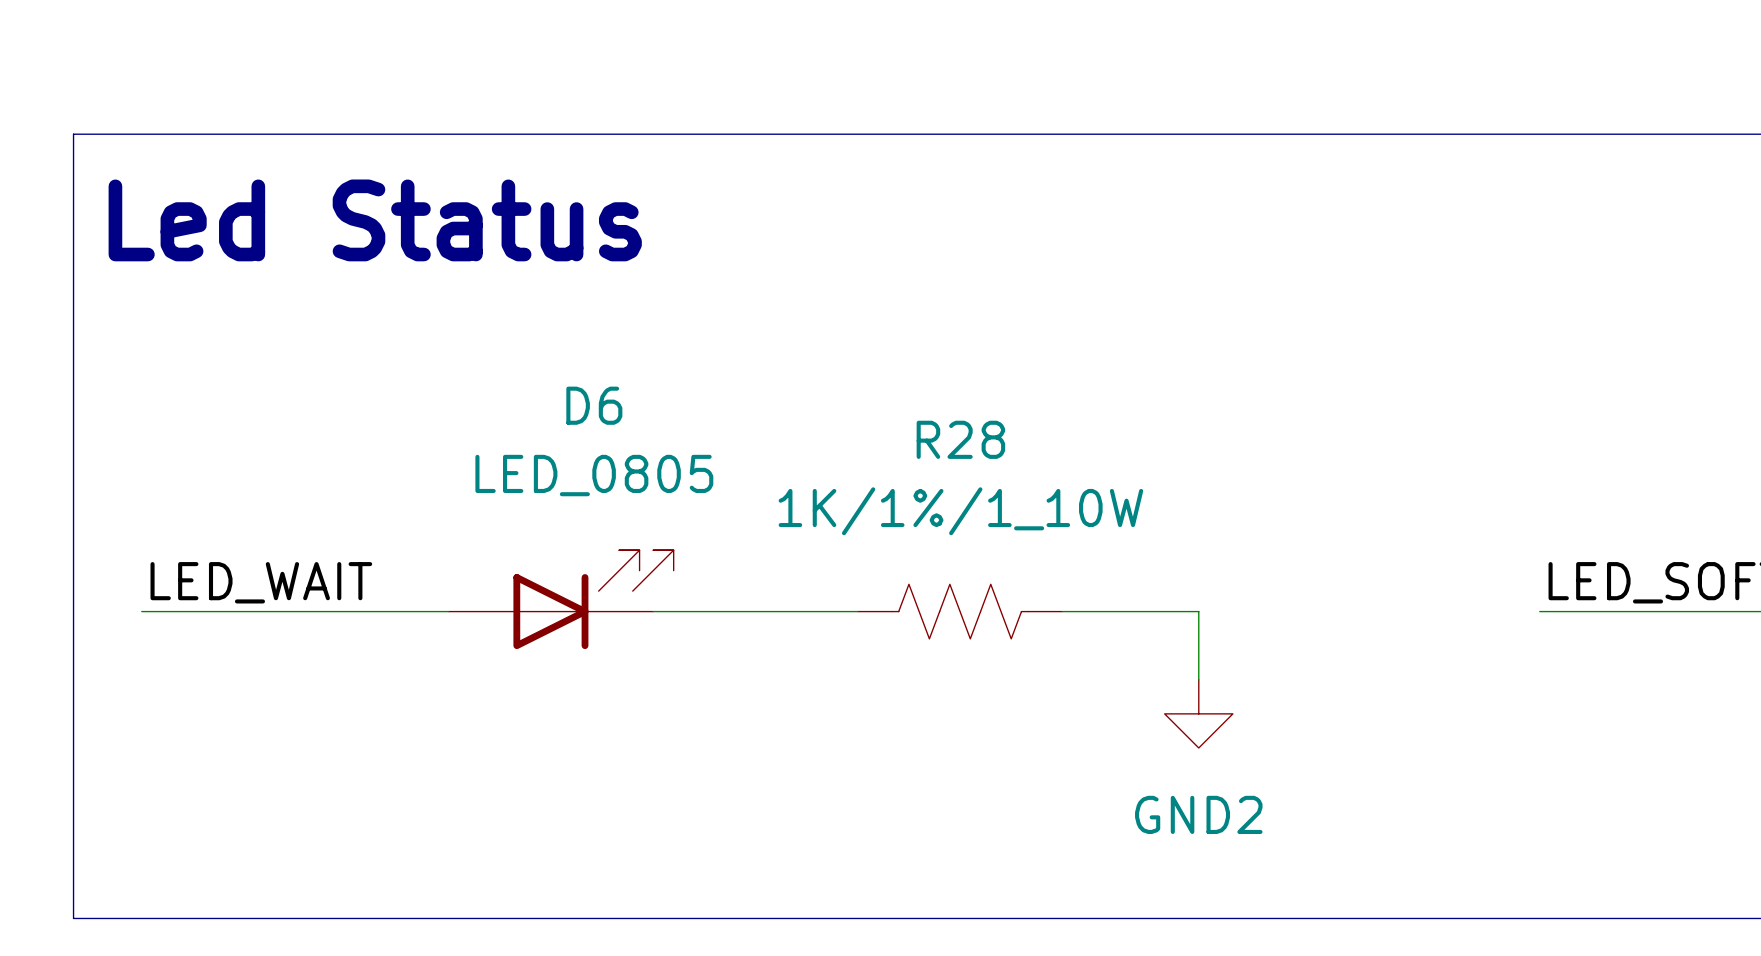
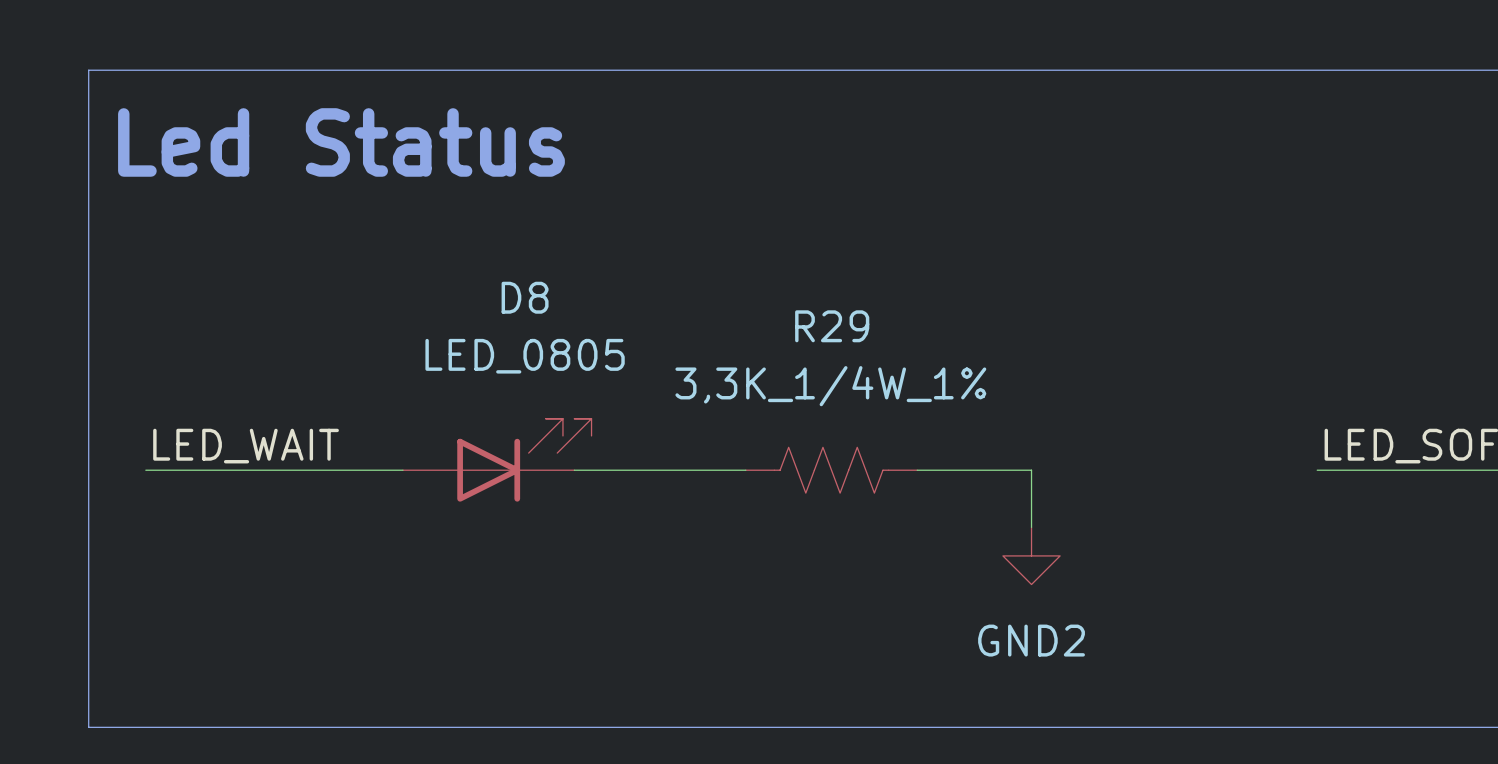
D6 name: D6 (594, 405) -> D8 (525, 297)
R28 name: R28 (960, 439) -> R29 (832, 326)
R28 value: 1K/1%/1_10W (960, 511) -> 3,3K_1/4W_1% (830, 386)

